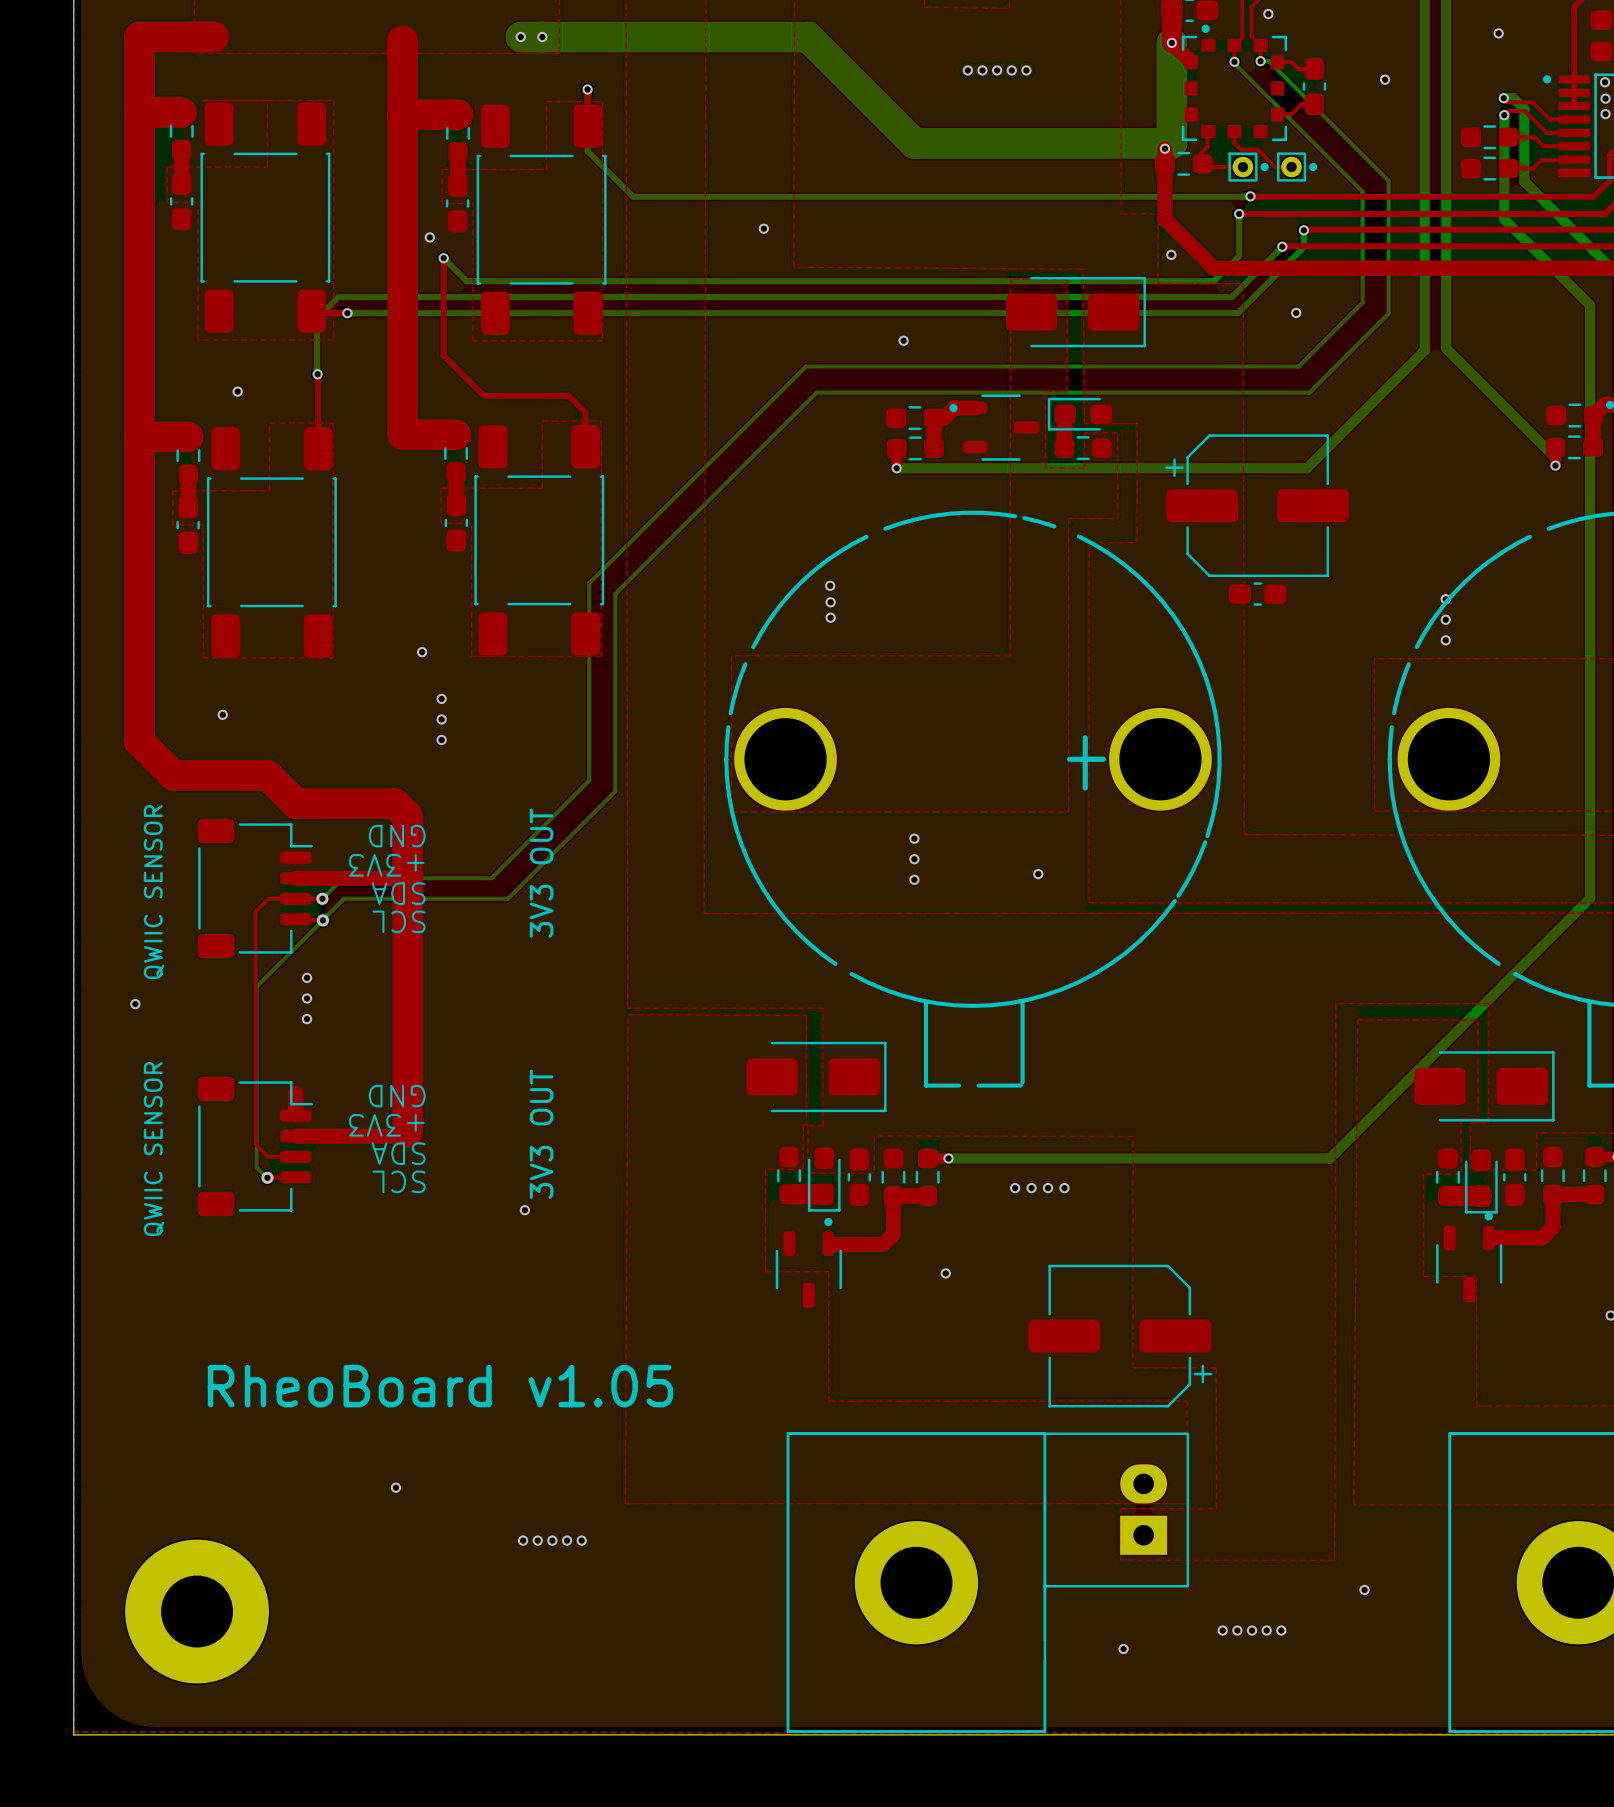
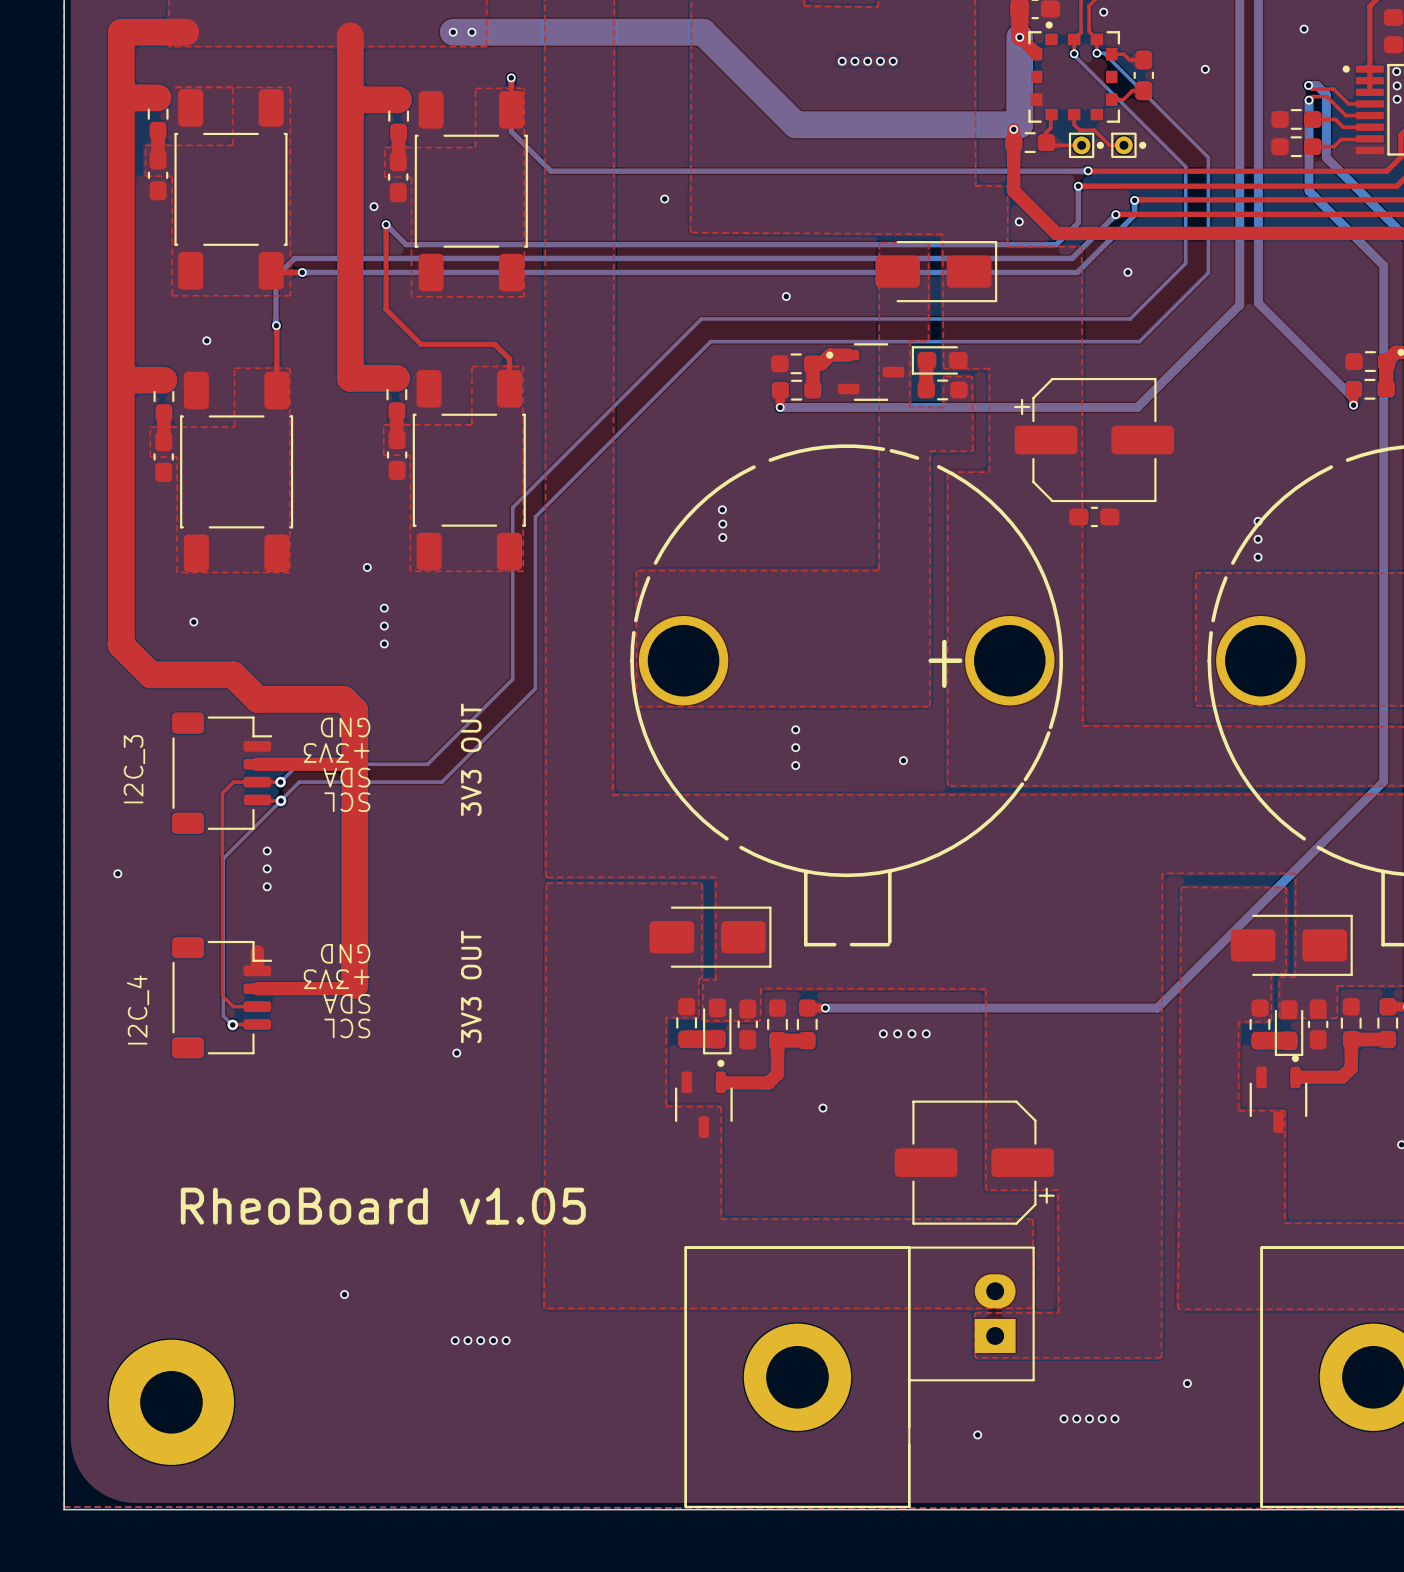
text: none -> I2C_3 (134, 769)
text: QWIIC SENSOR (154, 892) -> none
text: QWIIC SENSOR (154, 1149) -> none
text: none -> I2C_4 (138, 1009)

